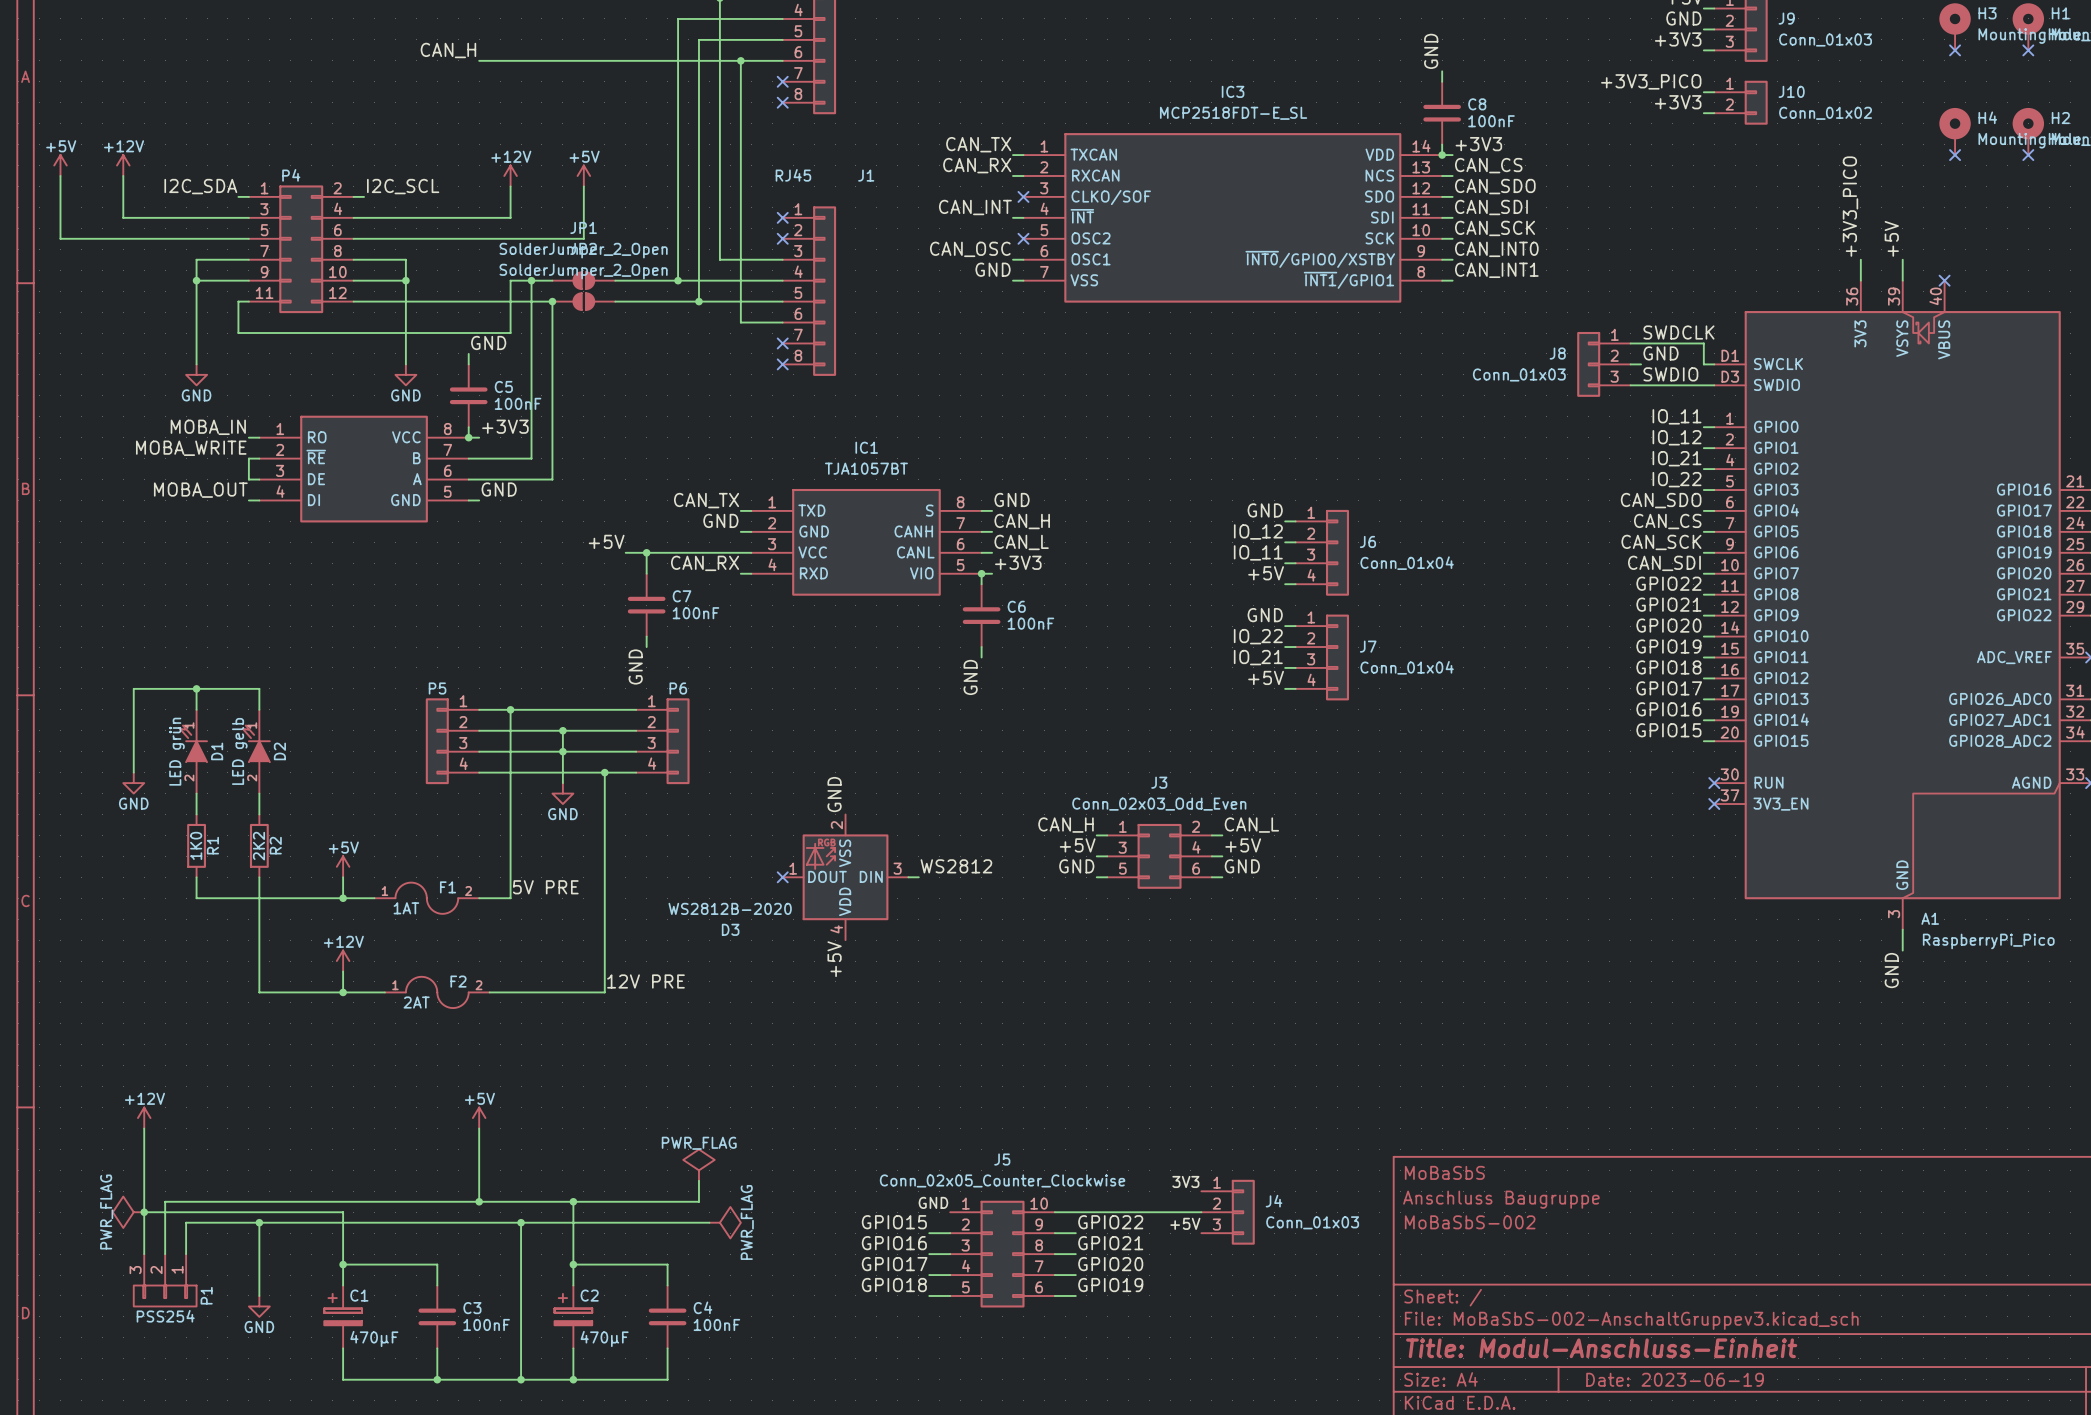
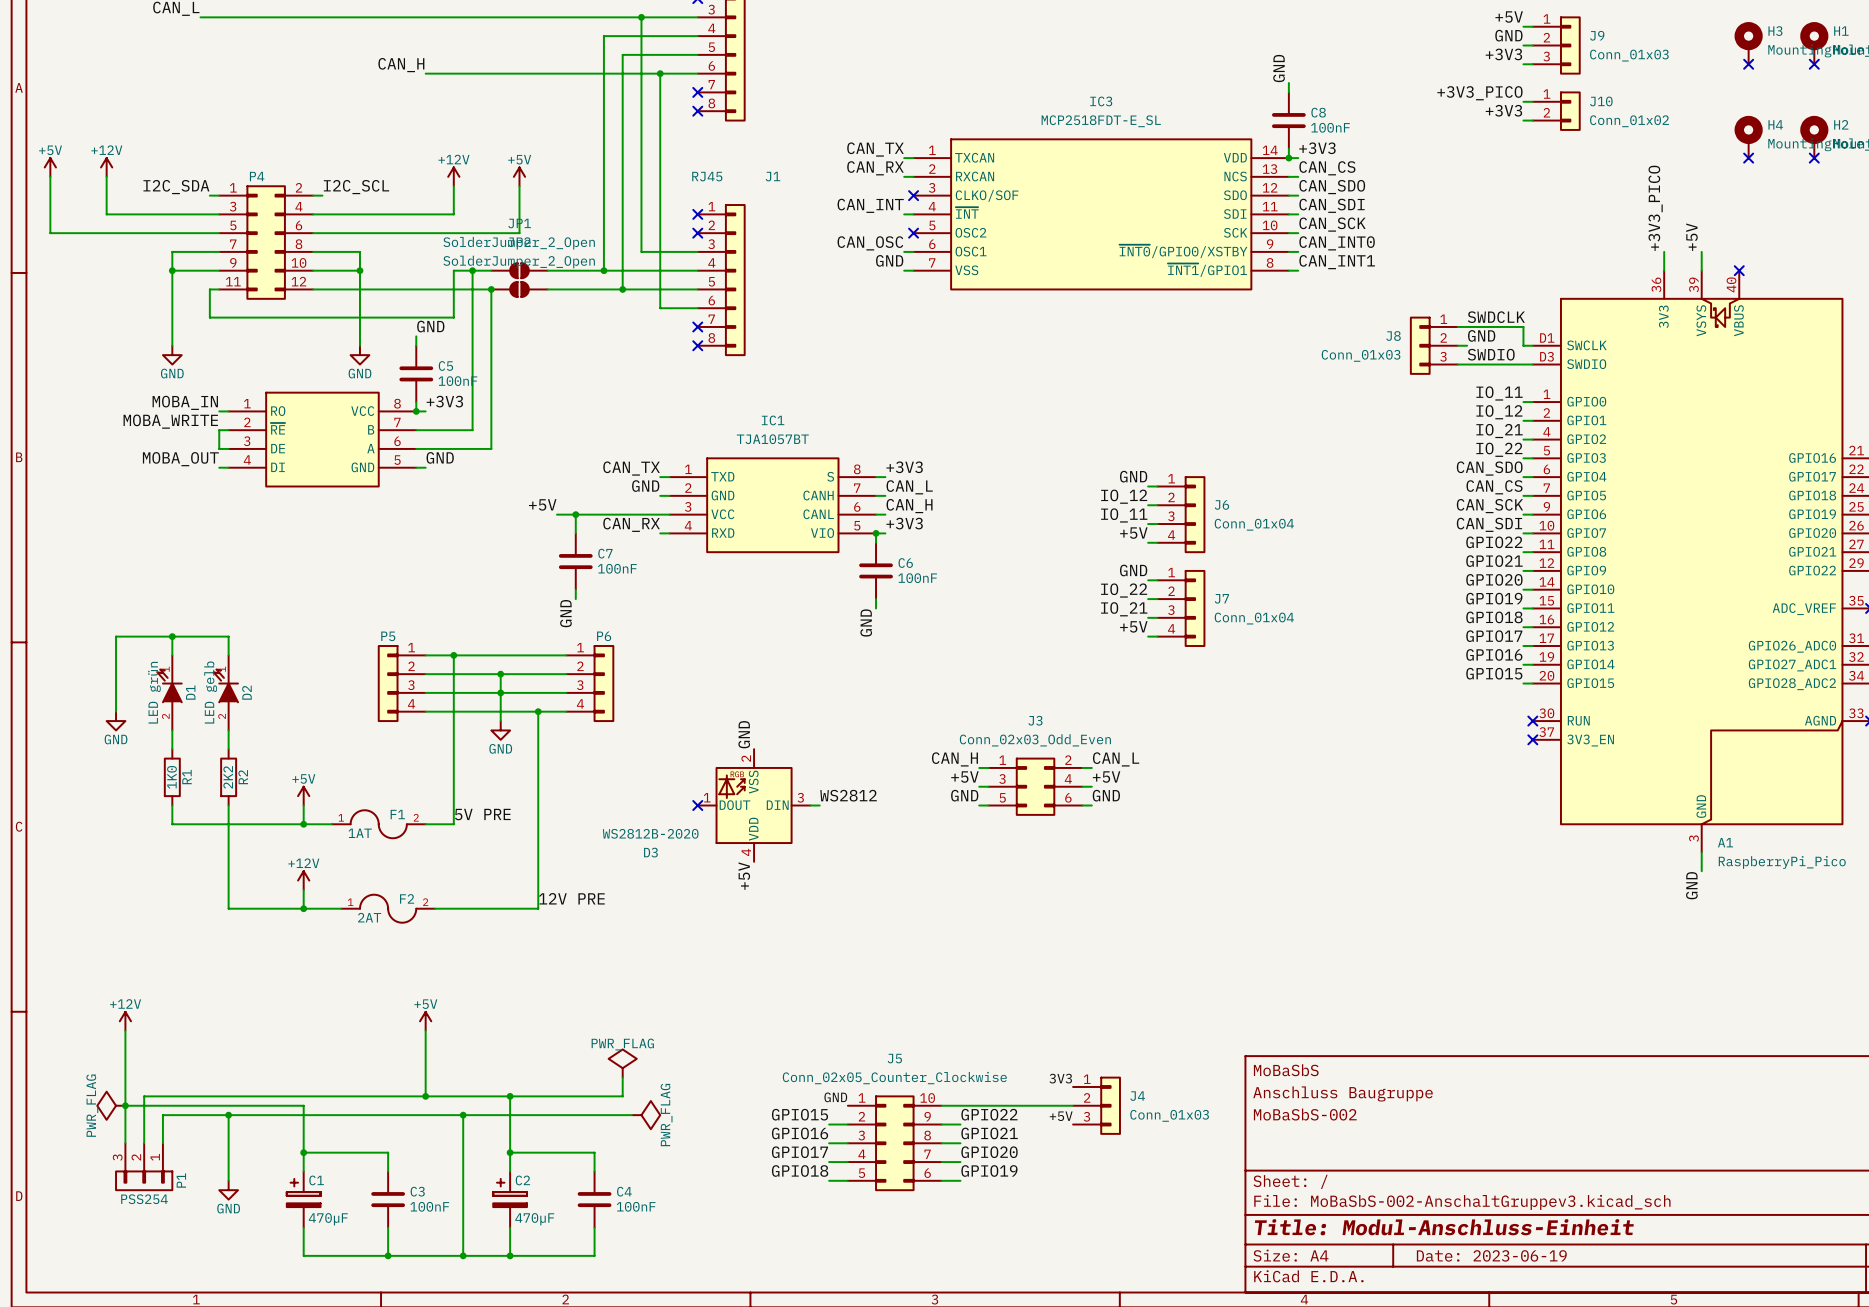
label: GND (1012, 499) -> +3V3 (904, 467)
label: CAN_H (1022, 521) -> CAN_L (909, 487)
label: CAN_L (1021, 542) -> CAN_H (909, 506)

